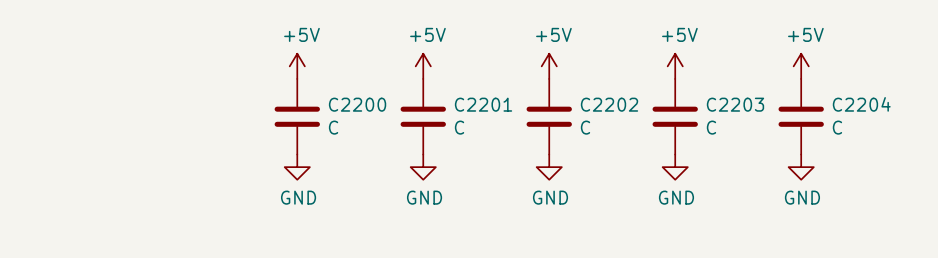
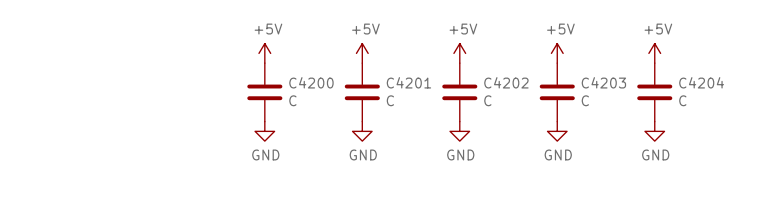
C2200 name: C2200 (357, 104) -> C4200 (311, 82)
C2201 name: C2201 (483, 104) -> C4201 (408, 82)
C2202 name: C2202 (609, 104) -> C4202 (506, 82)
C2203 name: C2203 (735, 104) -> C4203 (603, 82)
C2204 name: C2204 (861, 104) -> C4204 (701, 82)

